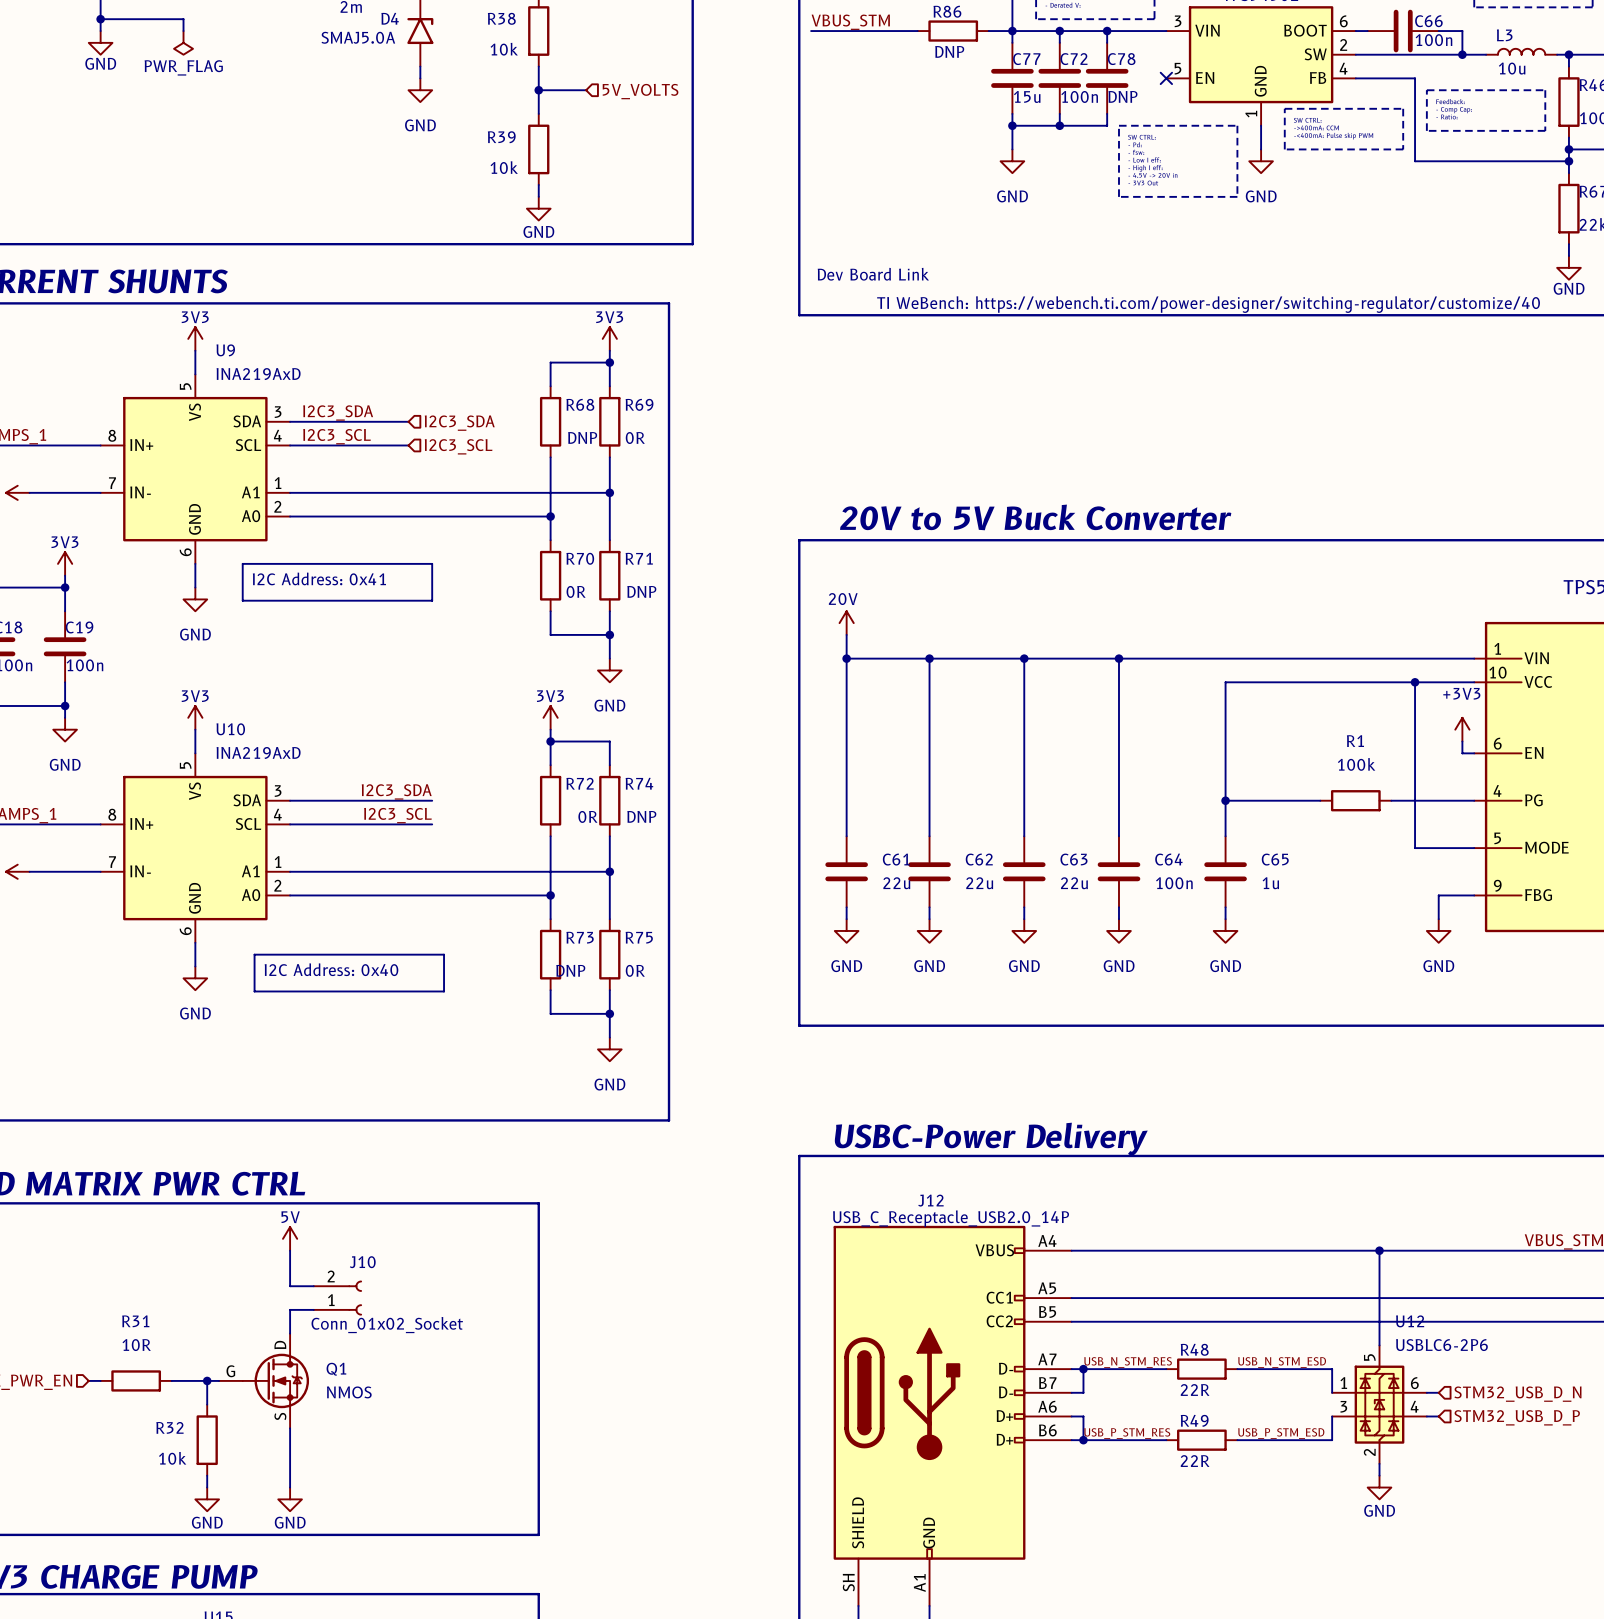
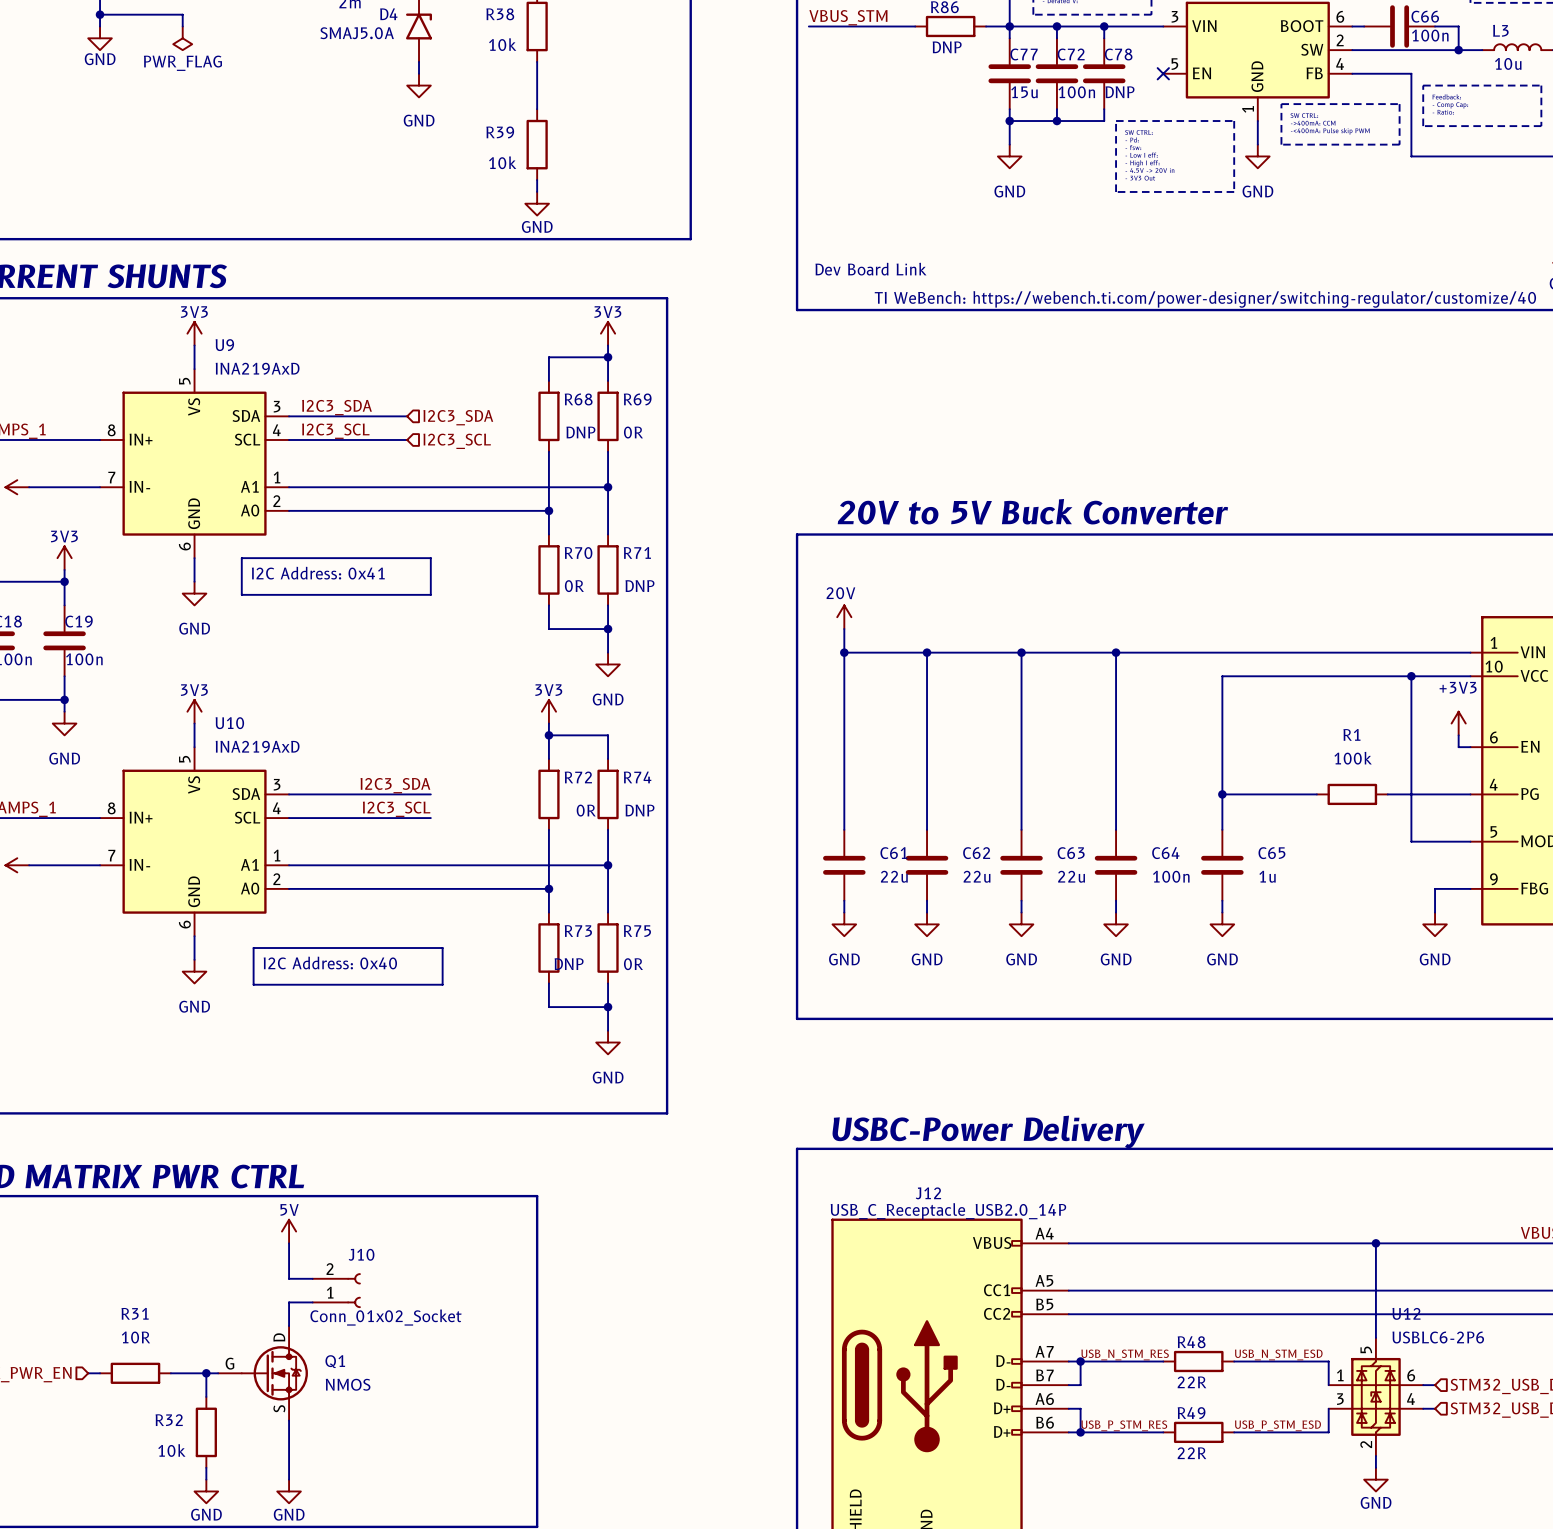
wire: (538, 90) (586, 90) -> none
junction: (538, 90) -> none
hierarchical label: 5V_VOLTS (640, 91) -> none

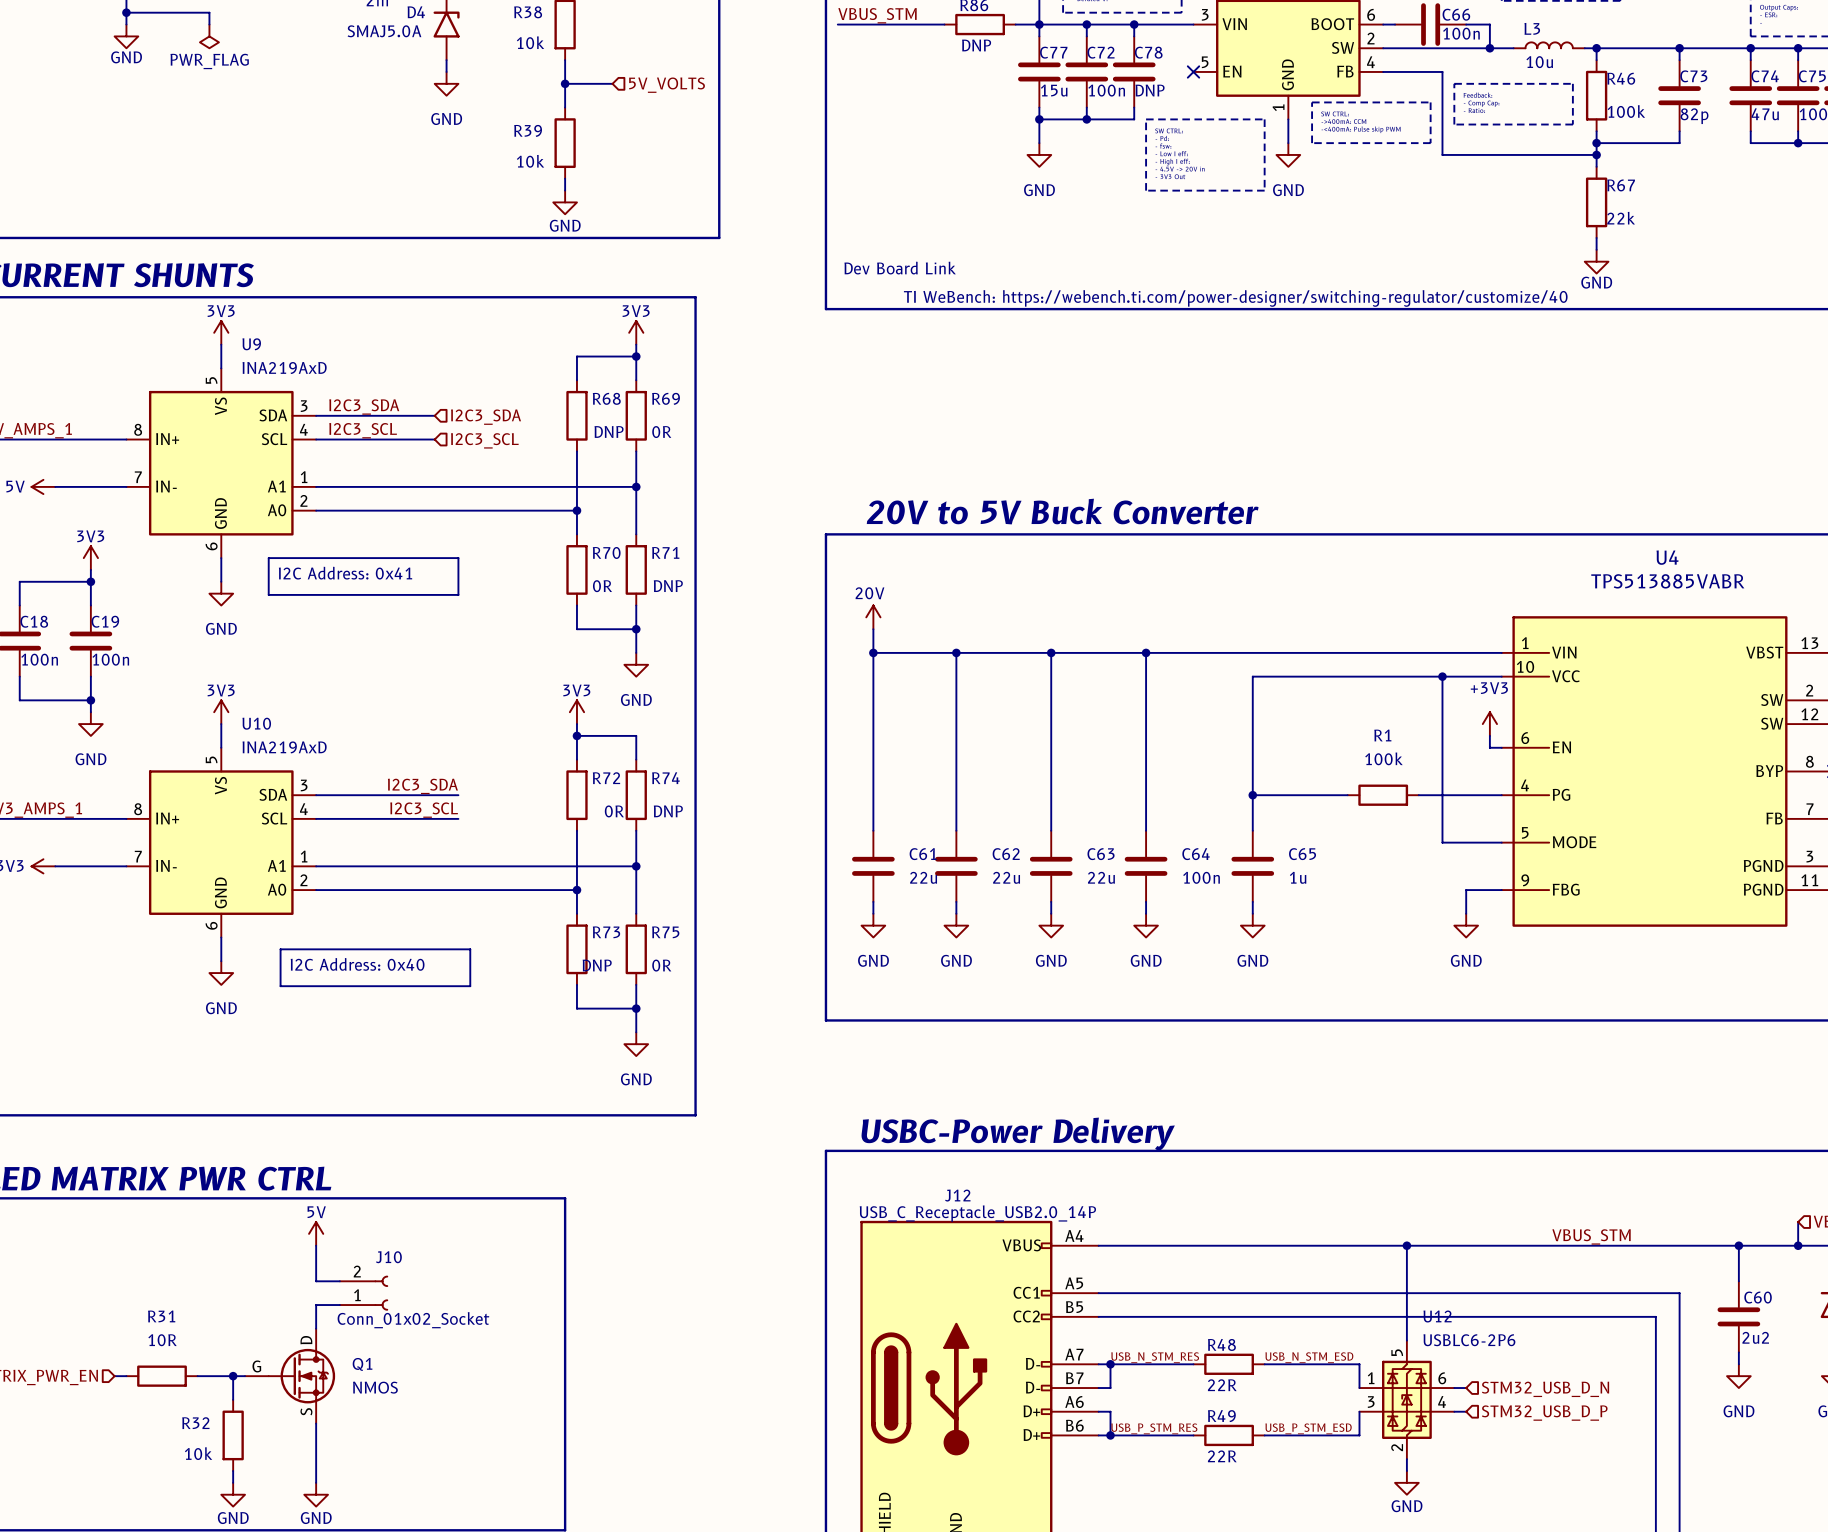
wire: none -> (565, 83) (612, 83)
junction: none -> (565, 83)
hierarchical label: none -> 5V_VOLTS (667, 85)

